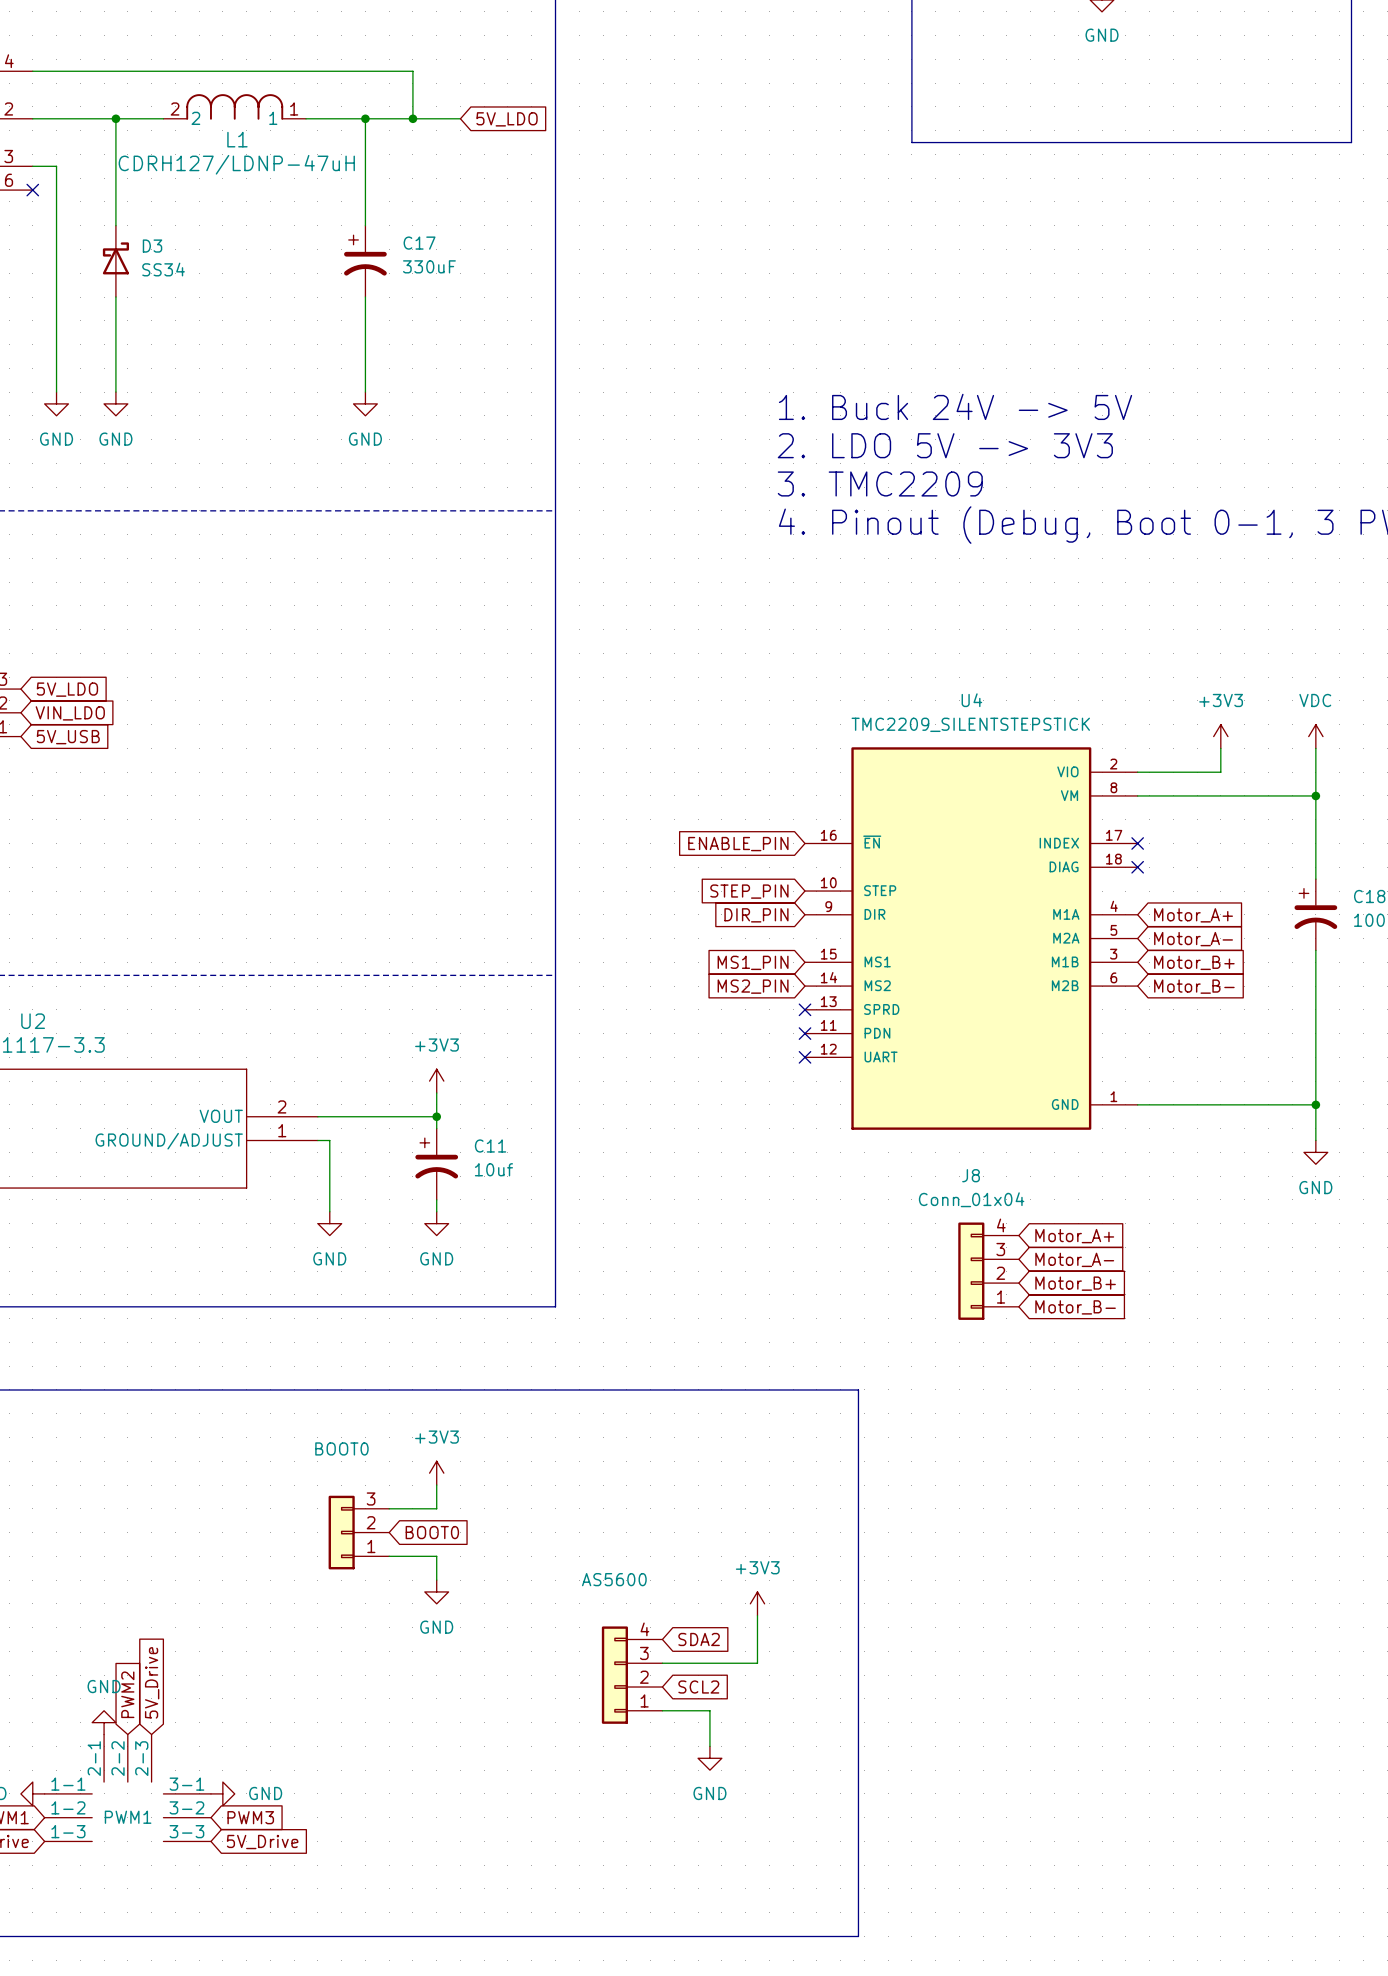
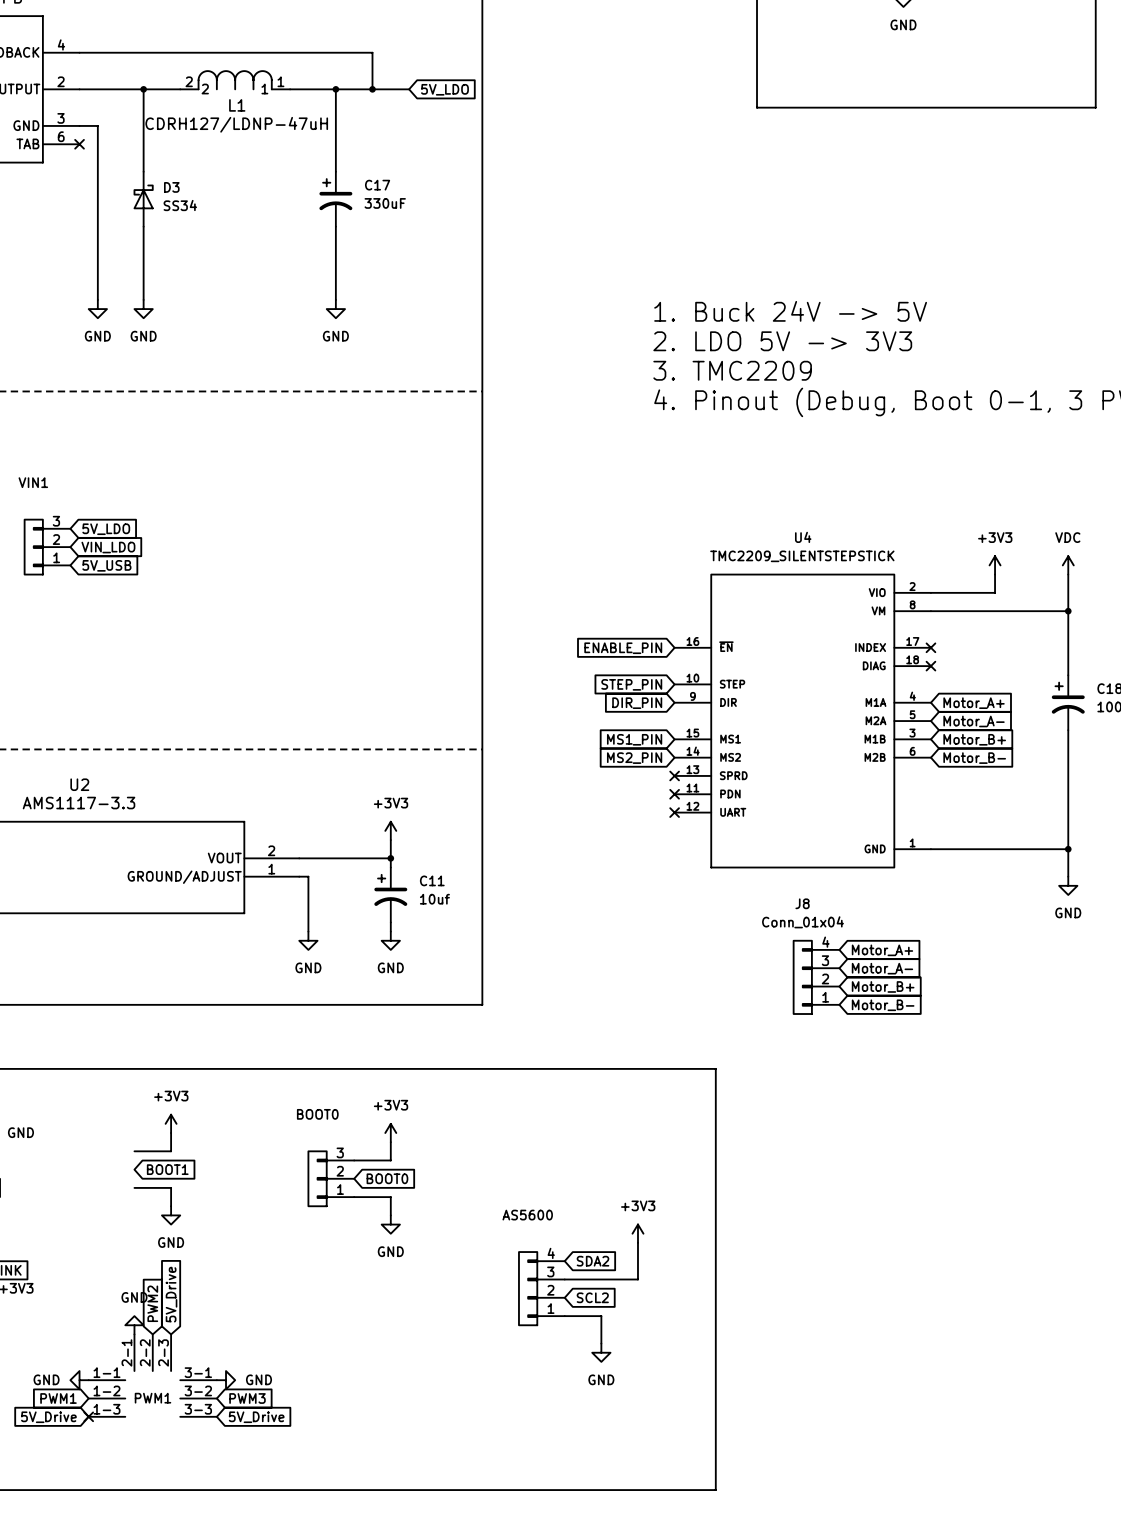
power symbol: none -> +3V3 (171, 1123)
wire: none -> (171, 1133) (171, 1151) (134, 1151)
global label: none -> BOOT1 (167, 1169)
wire: none -> (134, 1187) (171, 1187) (171, 1206)
power symbol: none -> GND (171, 1215)
no-connect mark: none -> (88, 1416)

